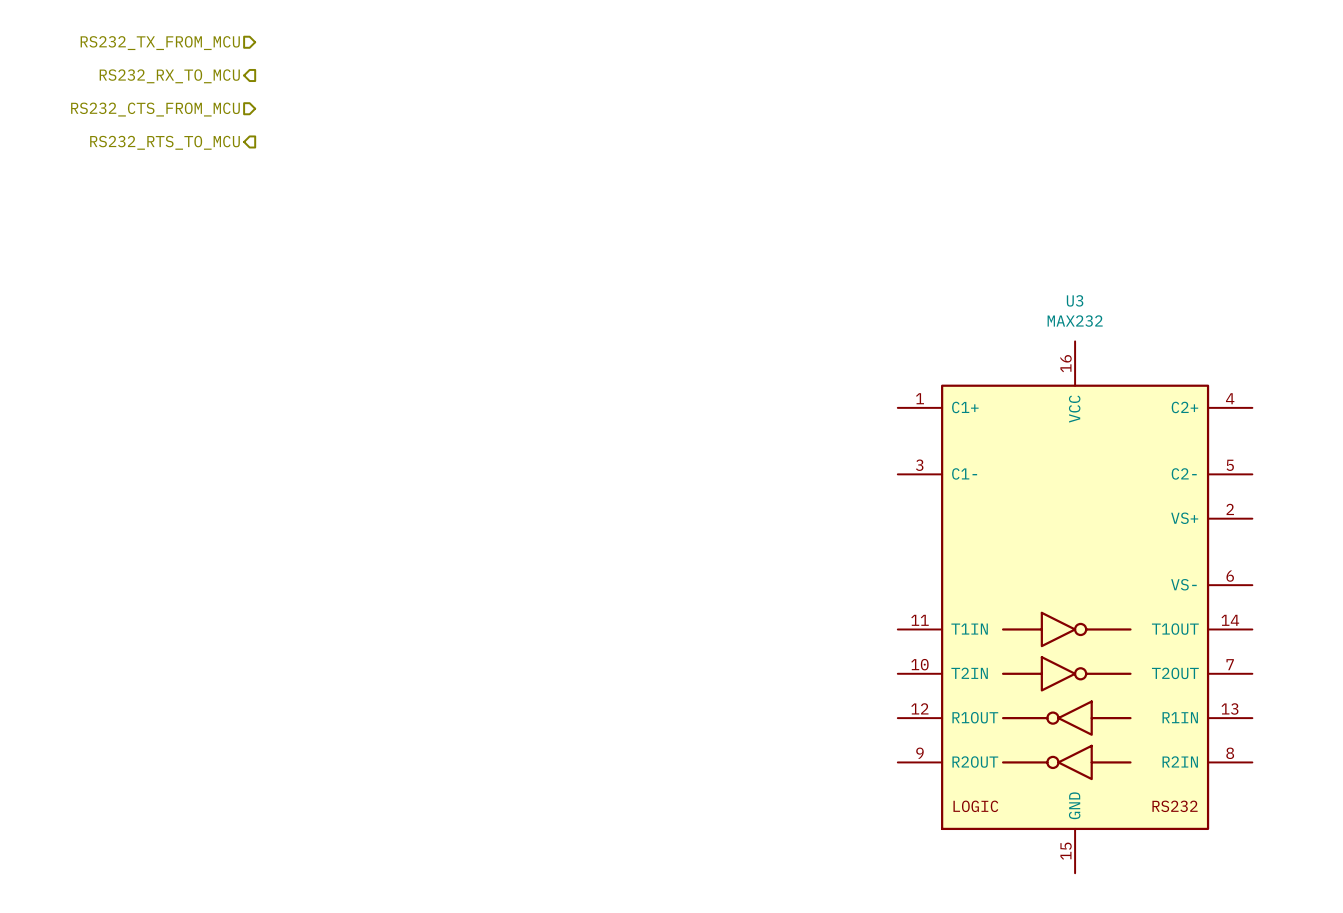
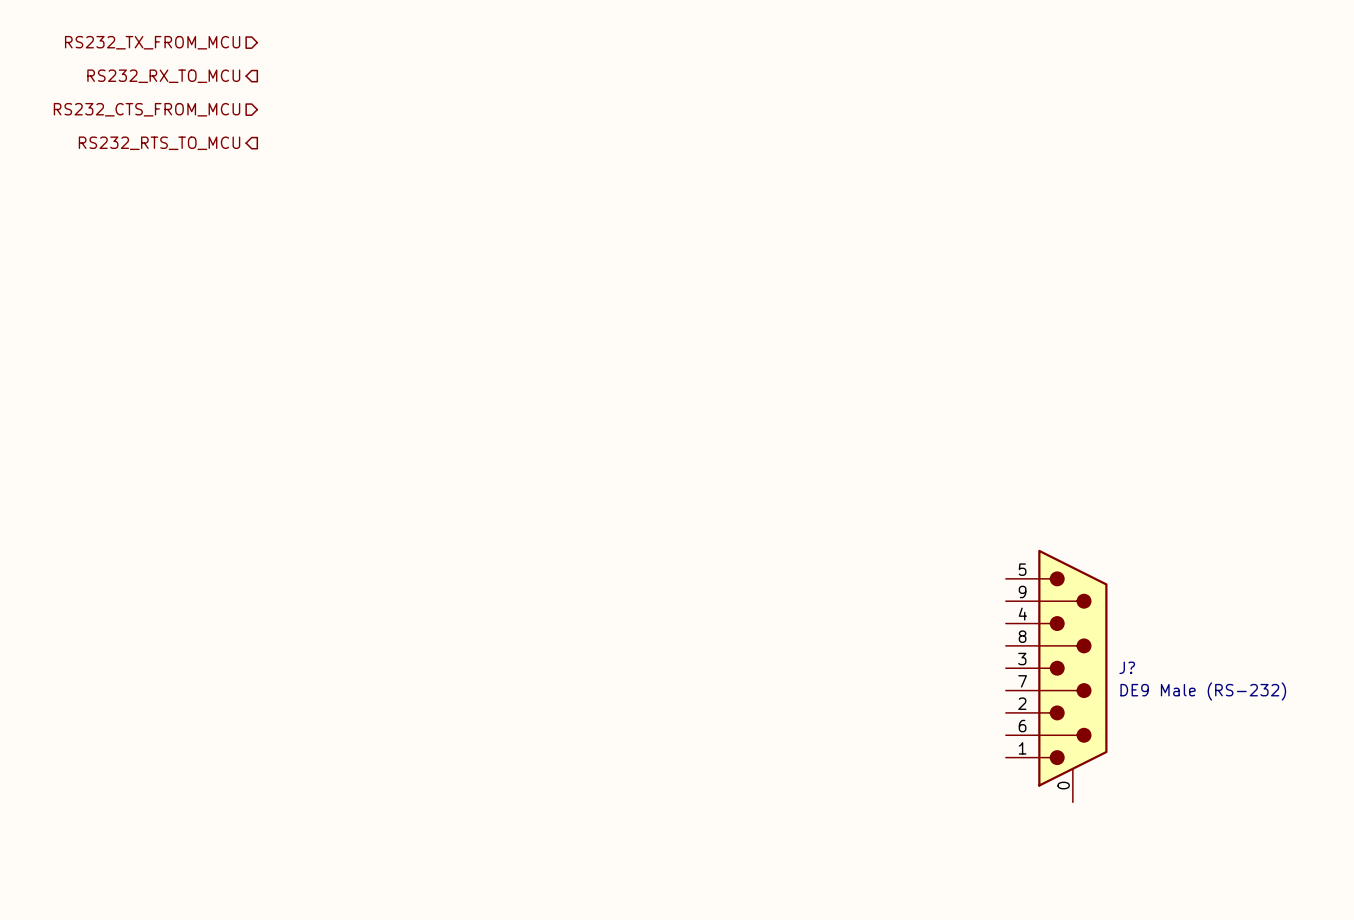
U3: MAX232 (1075, 607) -> none
J?: none -> DE9 Male (RS-232) (1056, 676)

